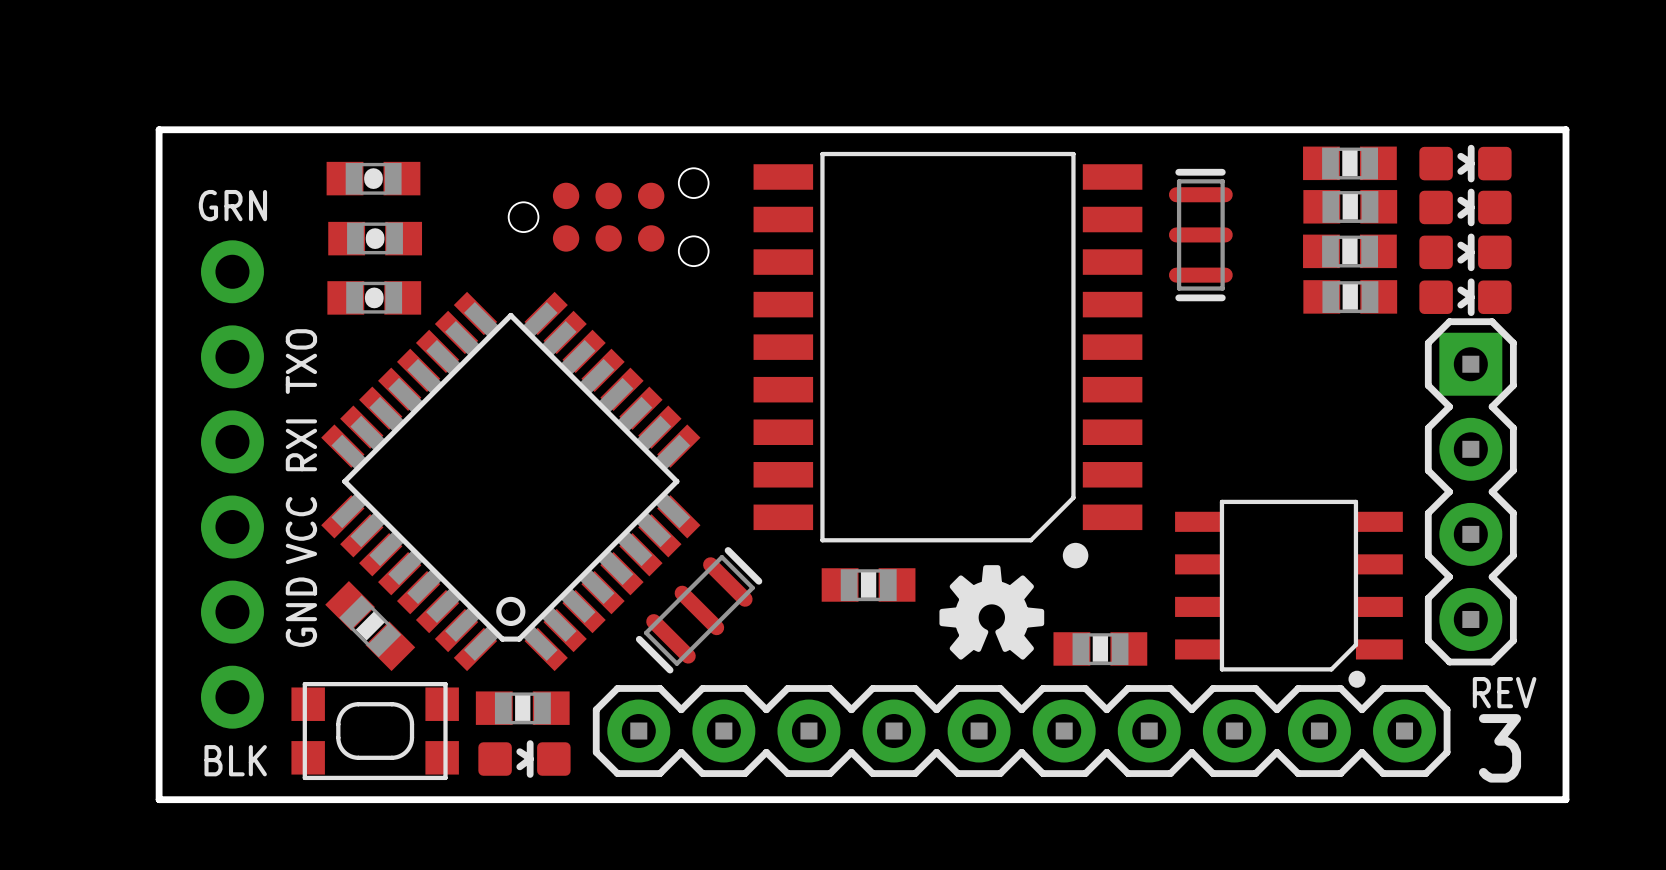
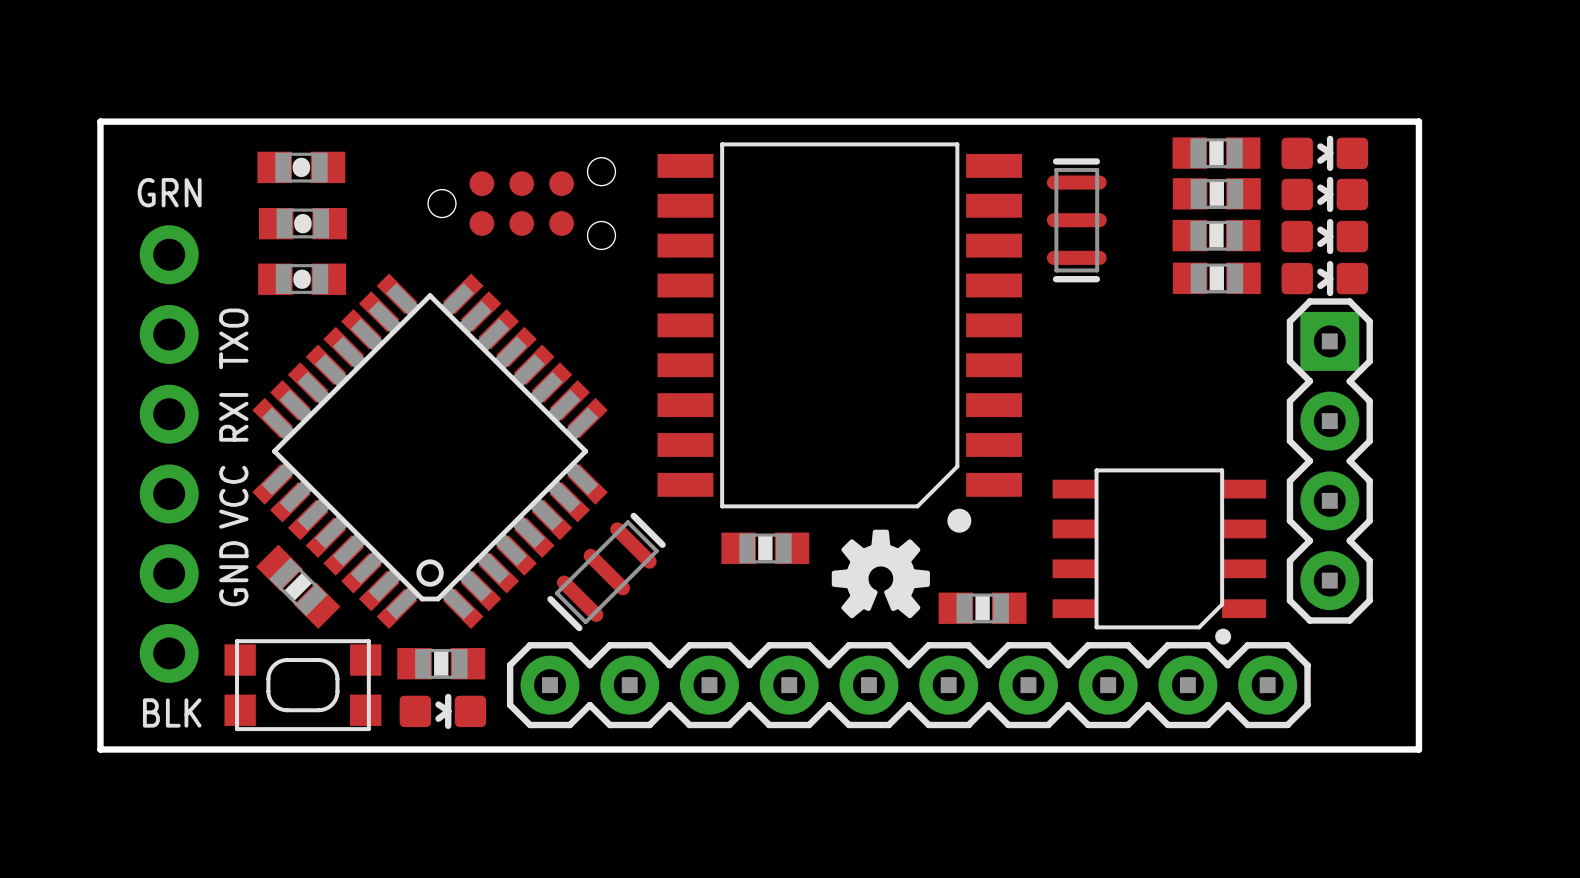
text: REV (1504, 692) -> none
text: 3 (1500, 748) -> none

